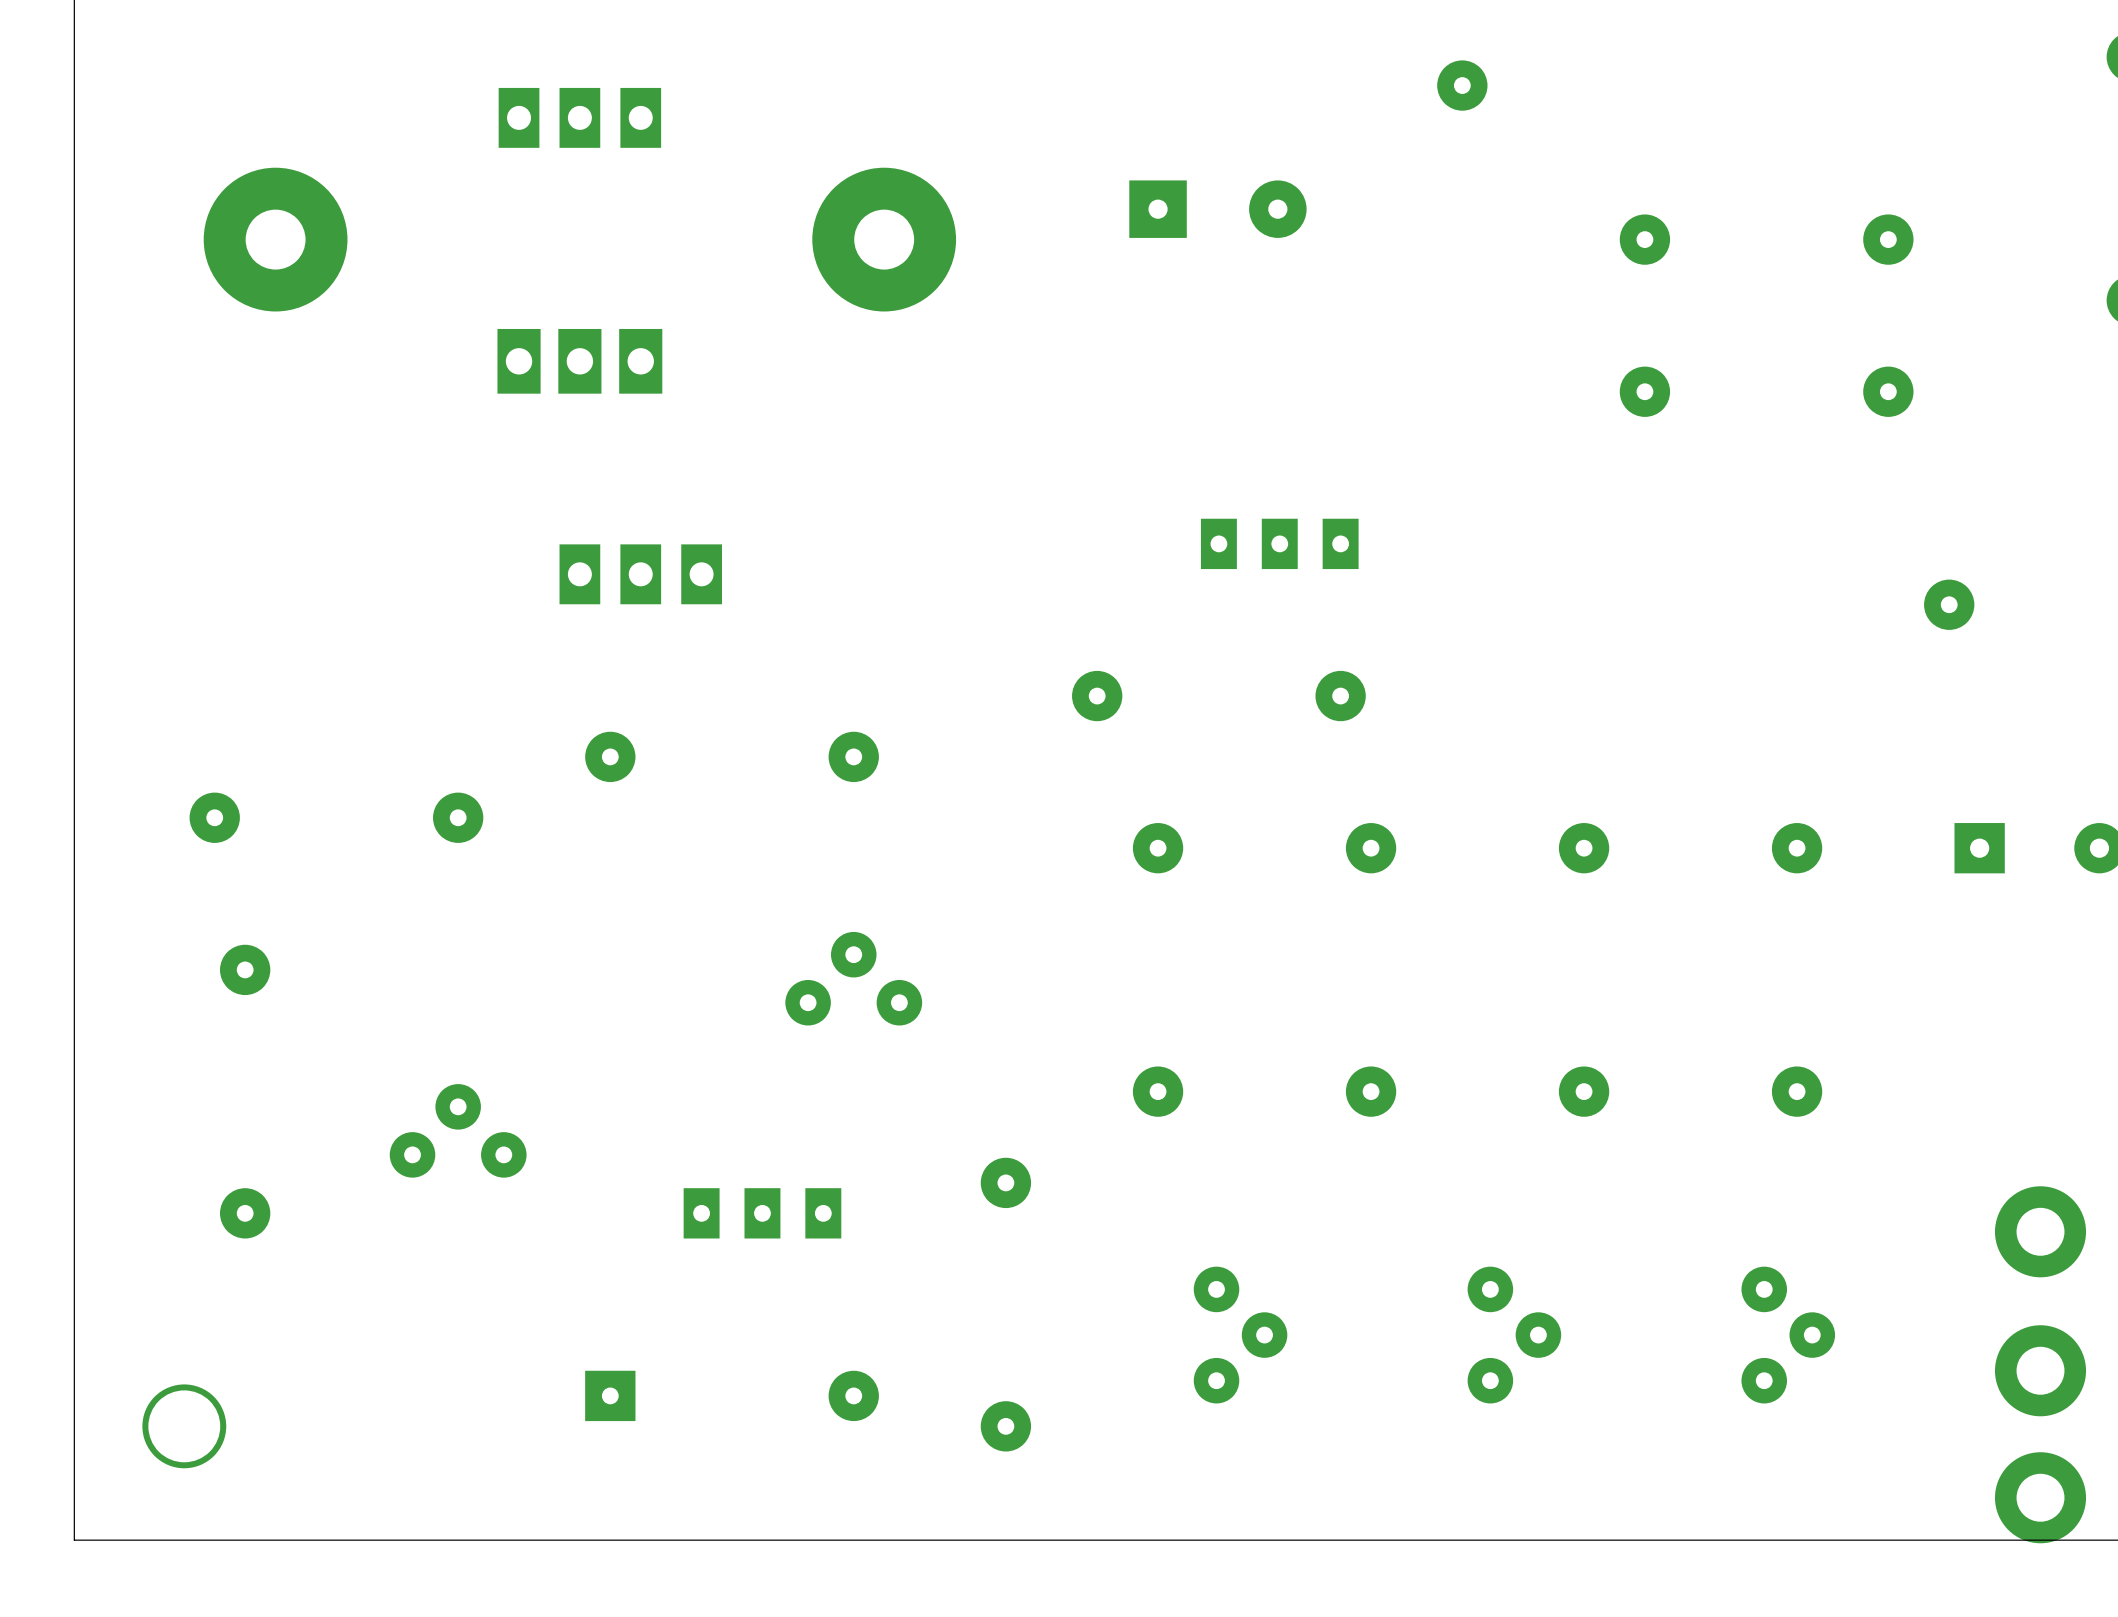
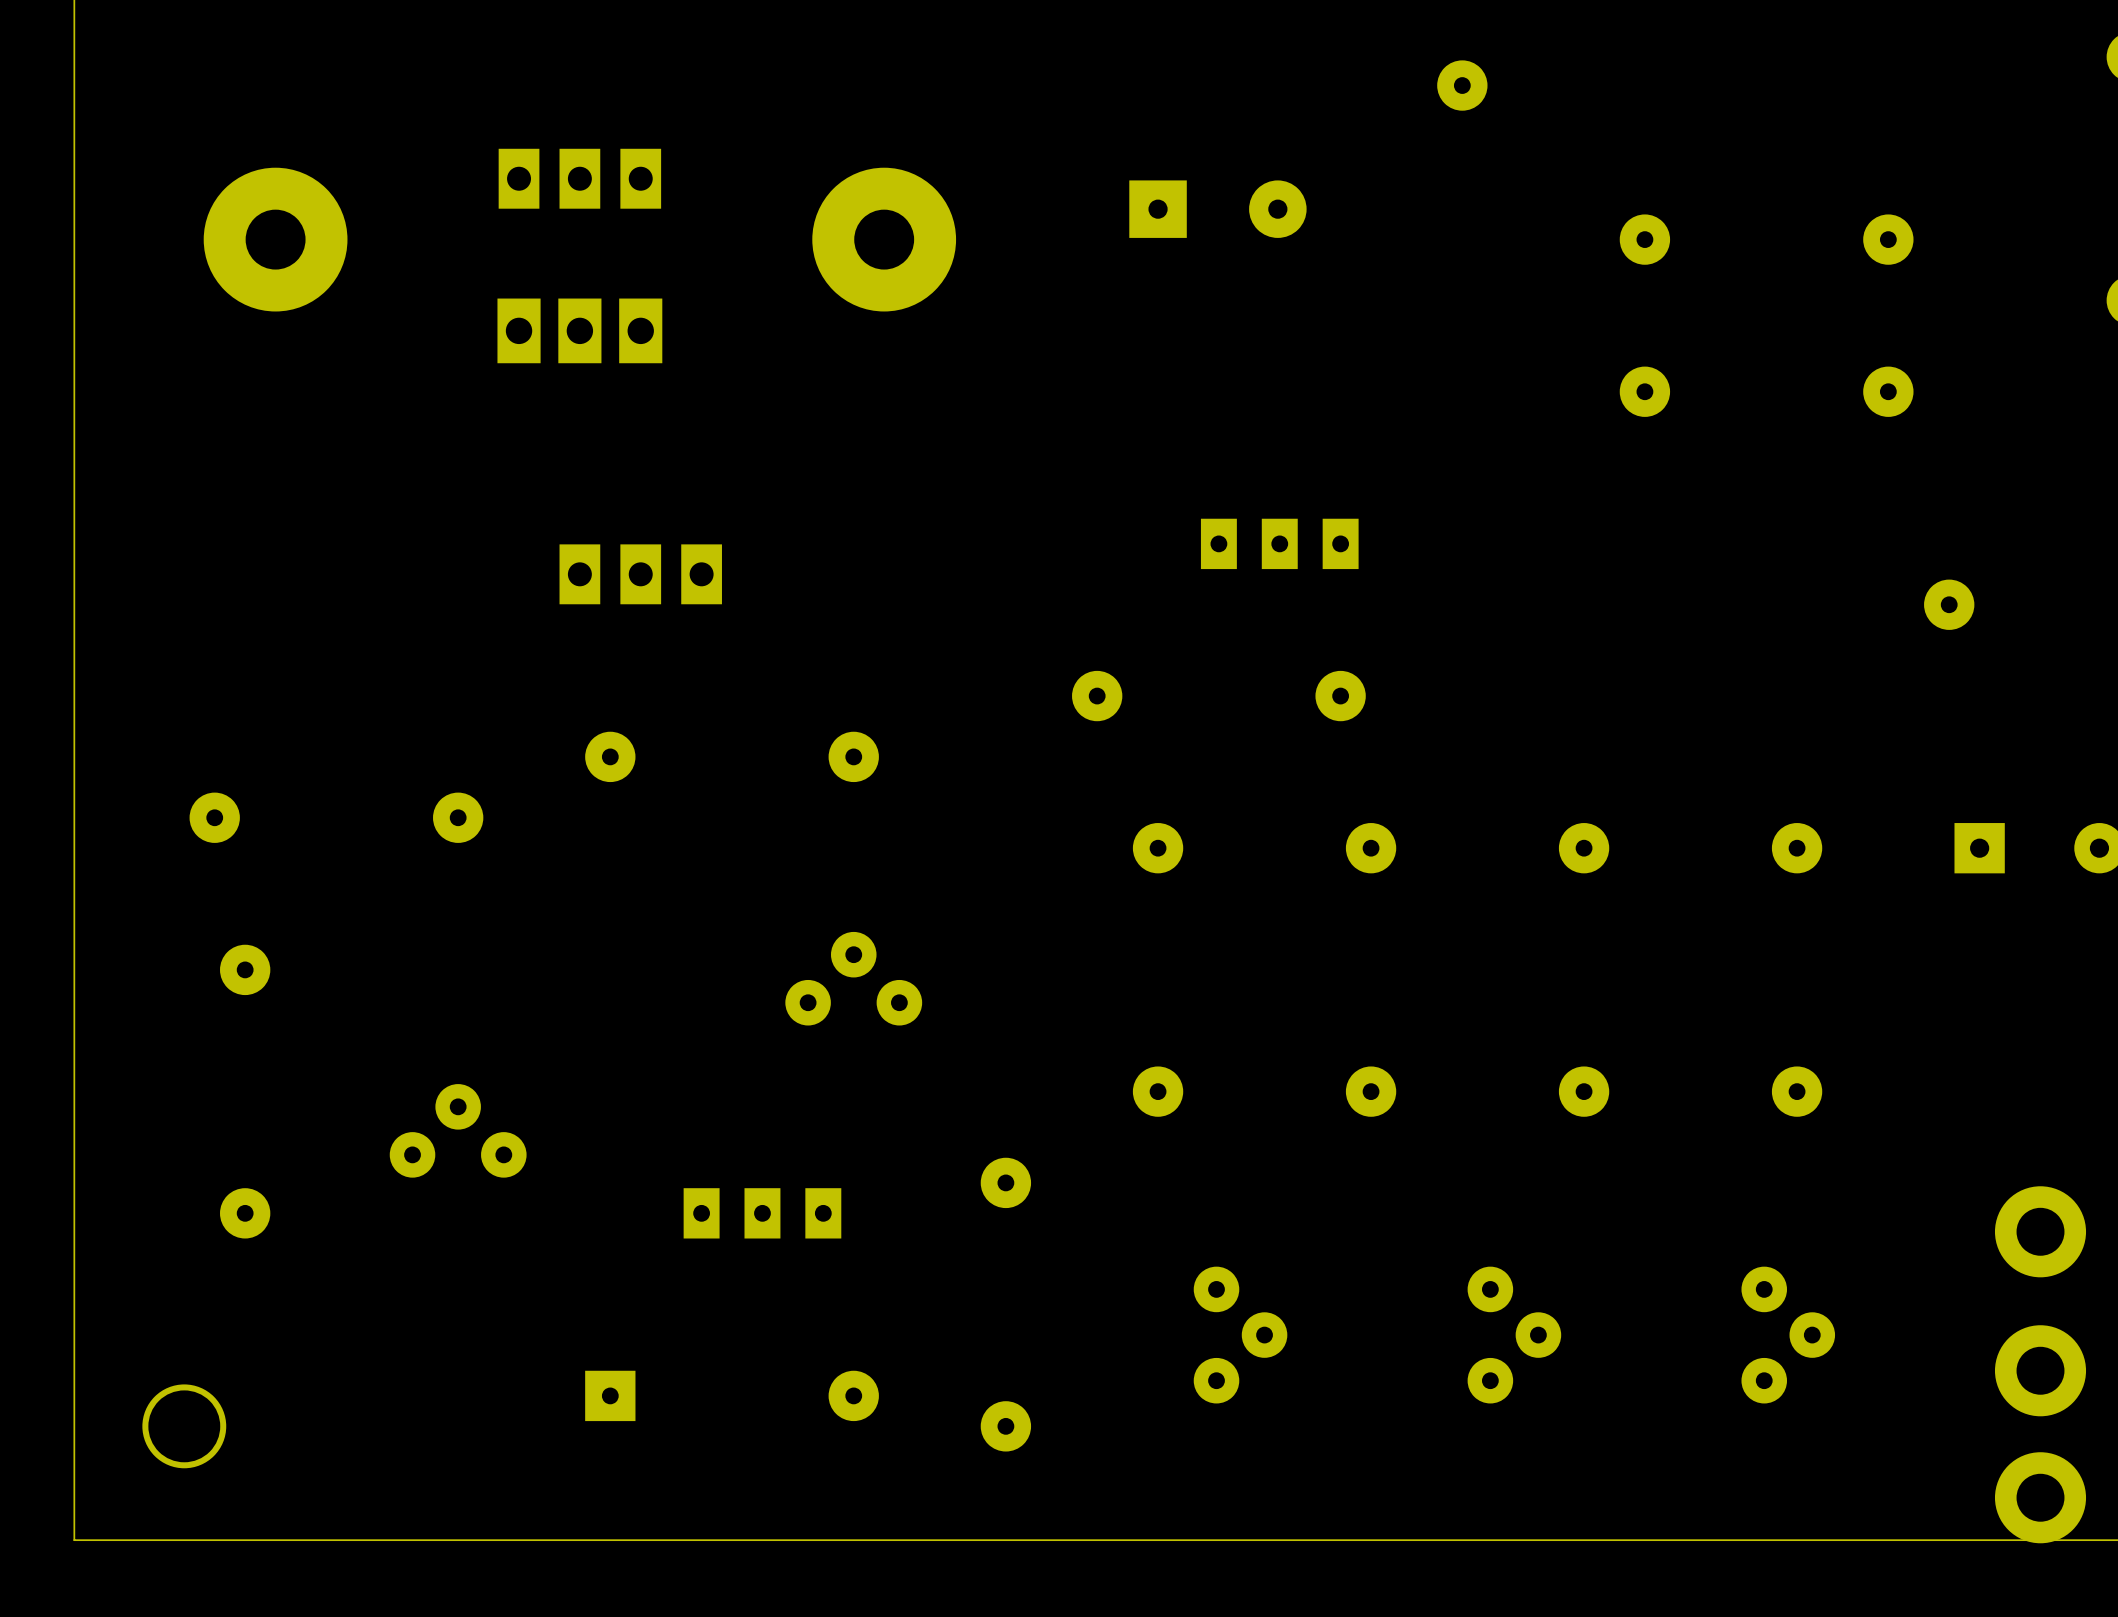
part position: (579, 117) -> (579, 178)
part position: (579, 361) -> (579, 330)

